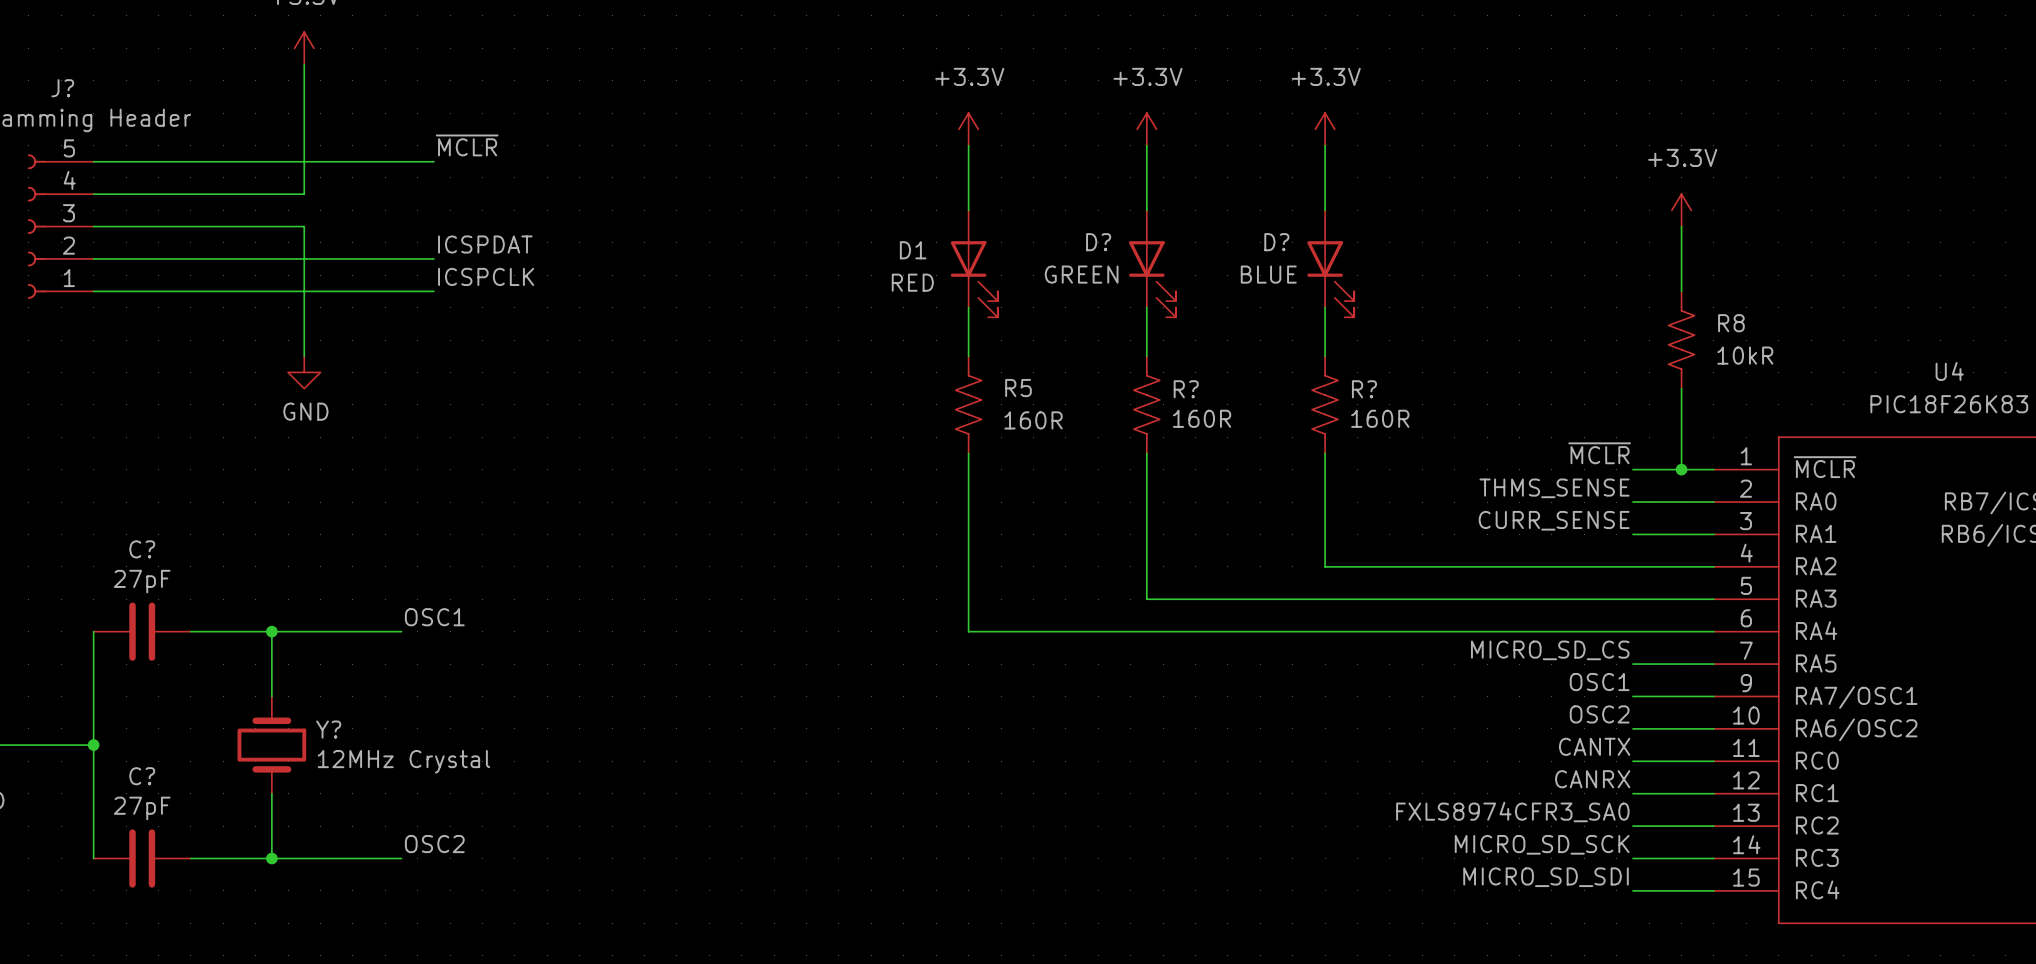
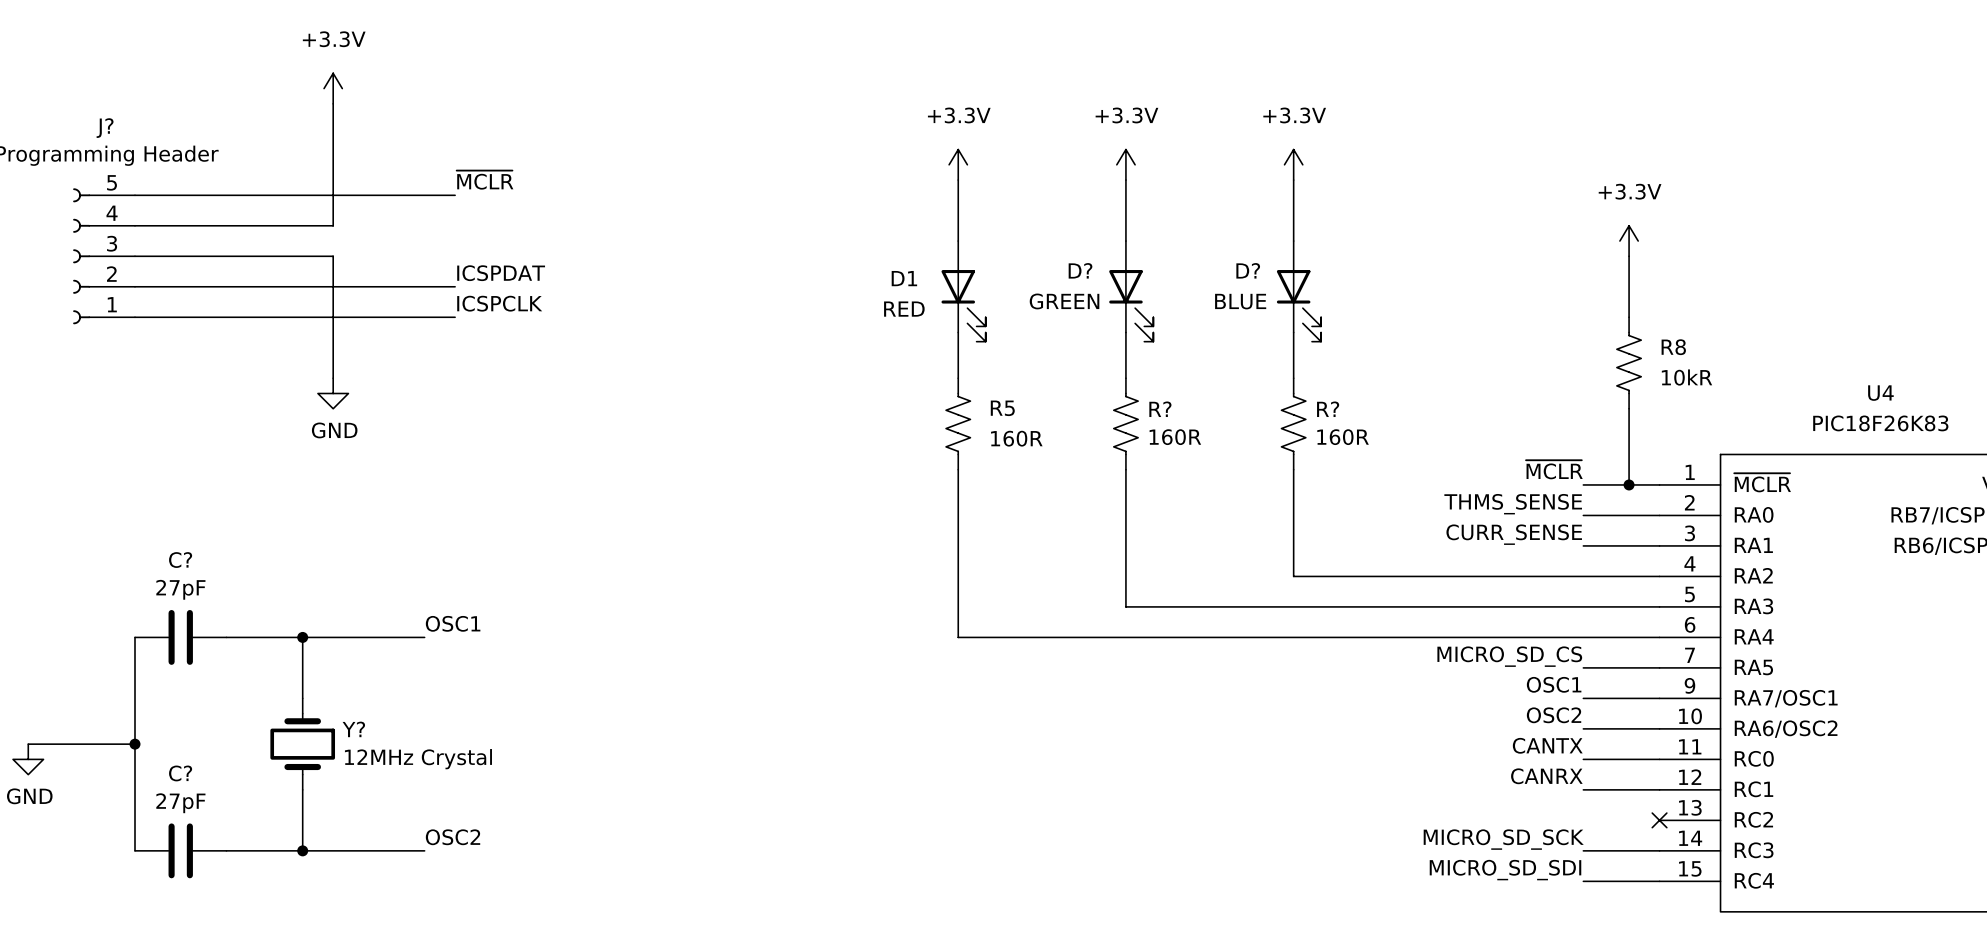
label: FXLS8974CFR3_SA0 (1512, 812) -> none
wire: (1632, 826) (1713, 826) -> none
no-connect mark: none -> (1659, 820)

